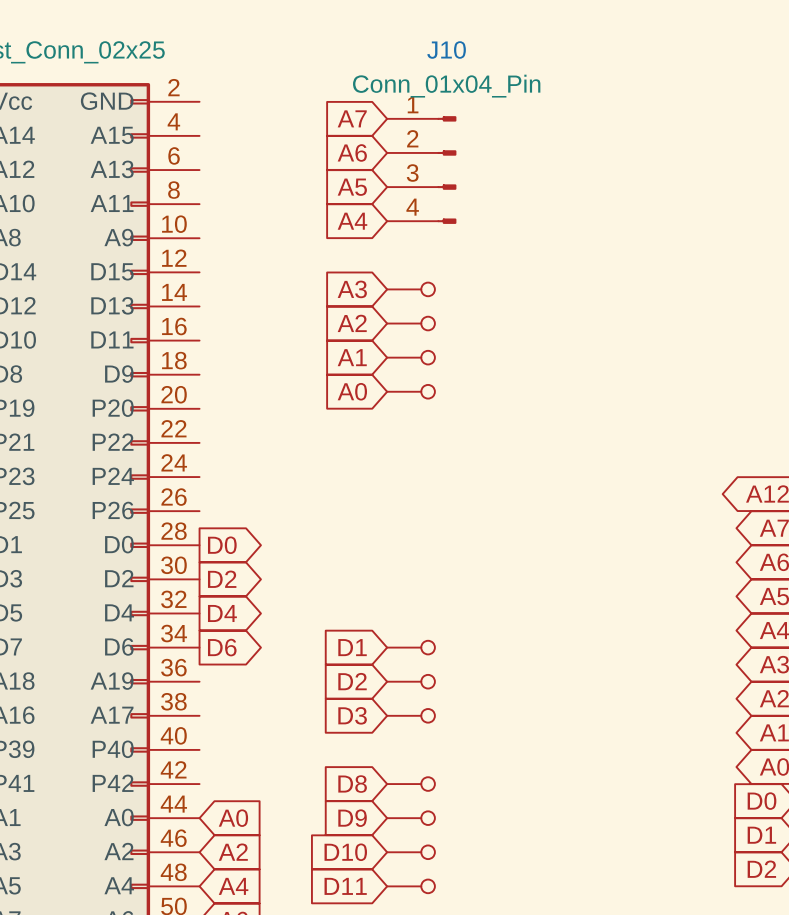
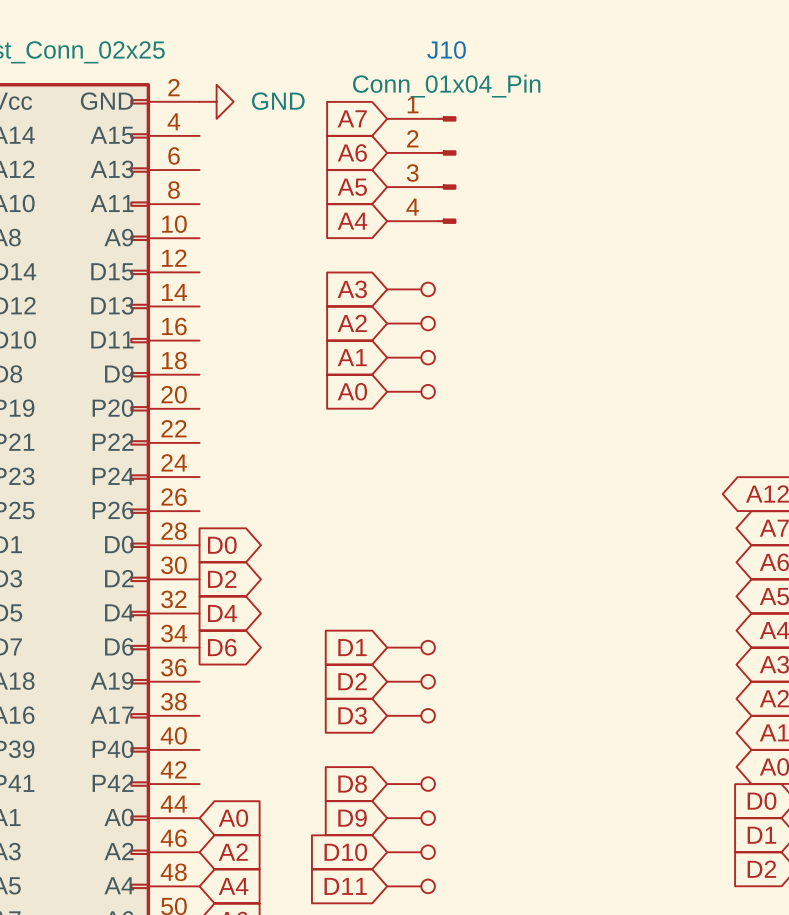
power symbol: none -> GND (216, 101)

